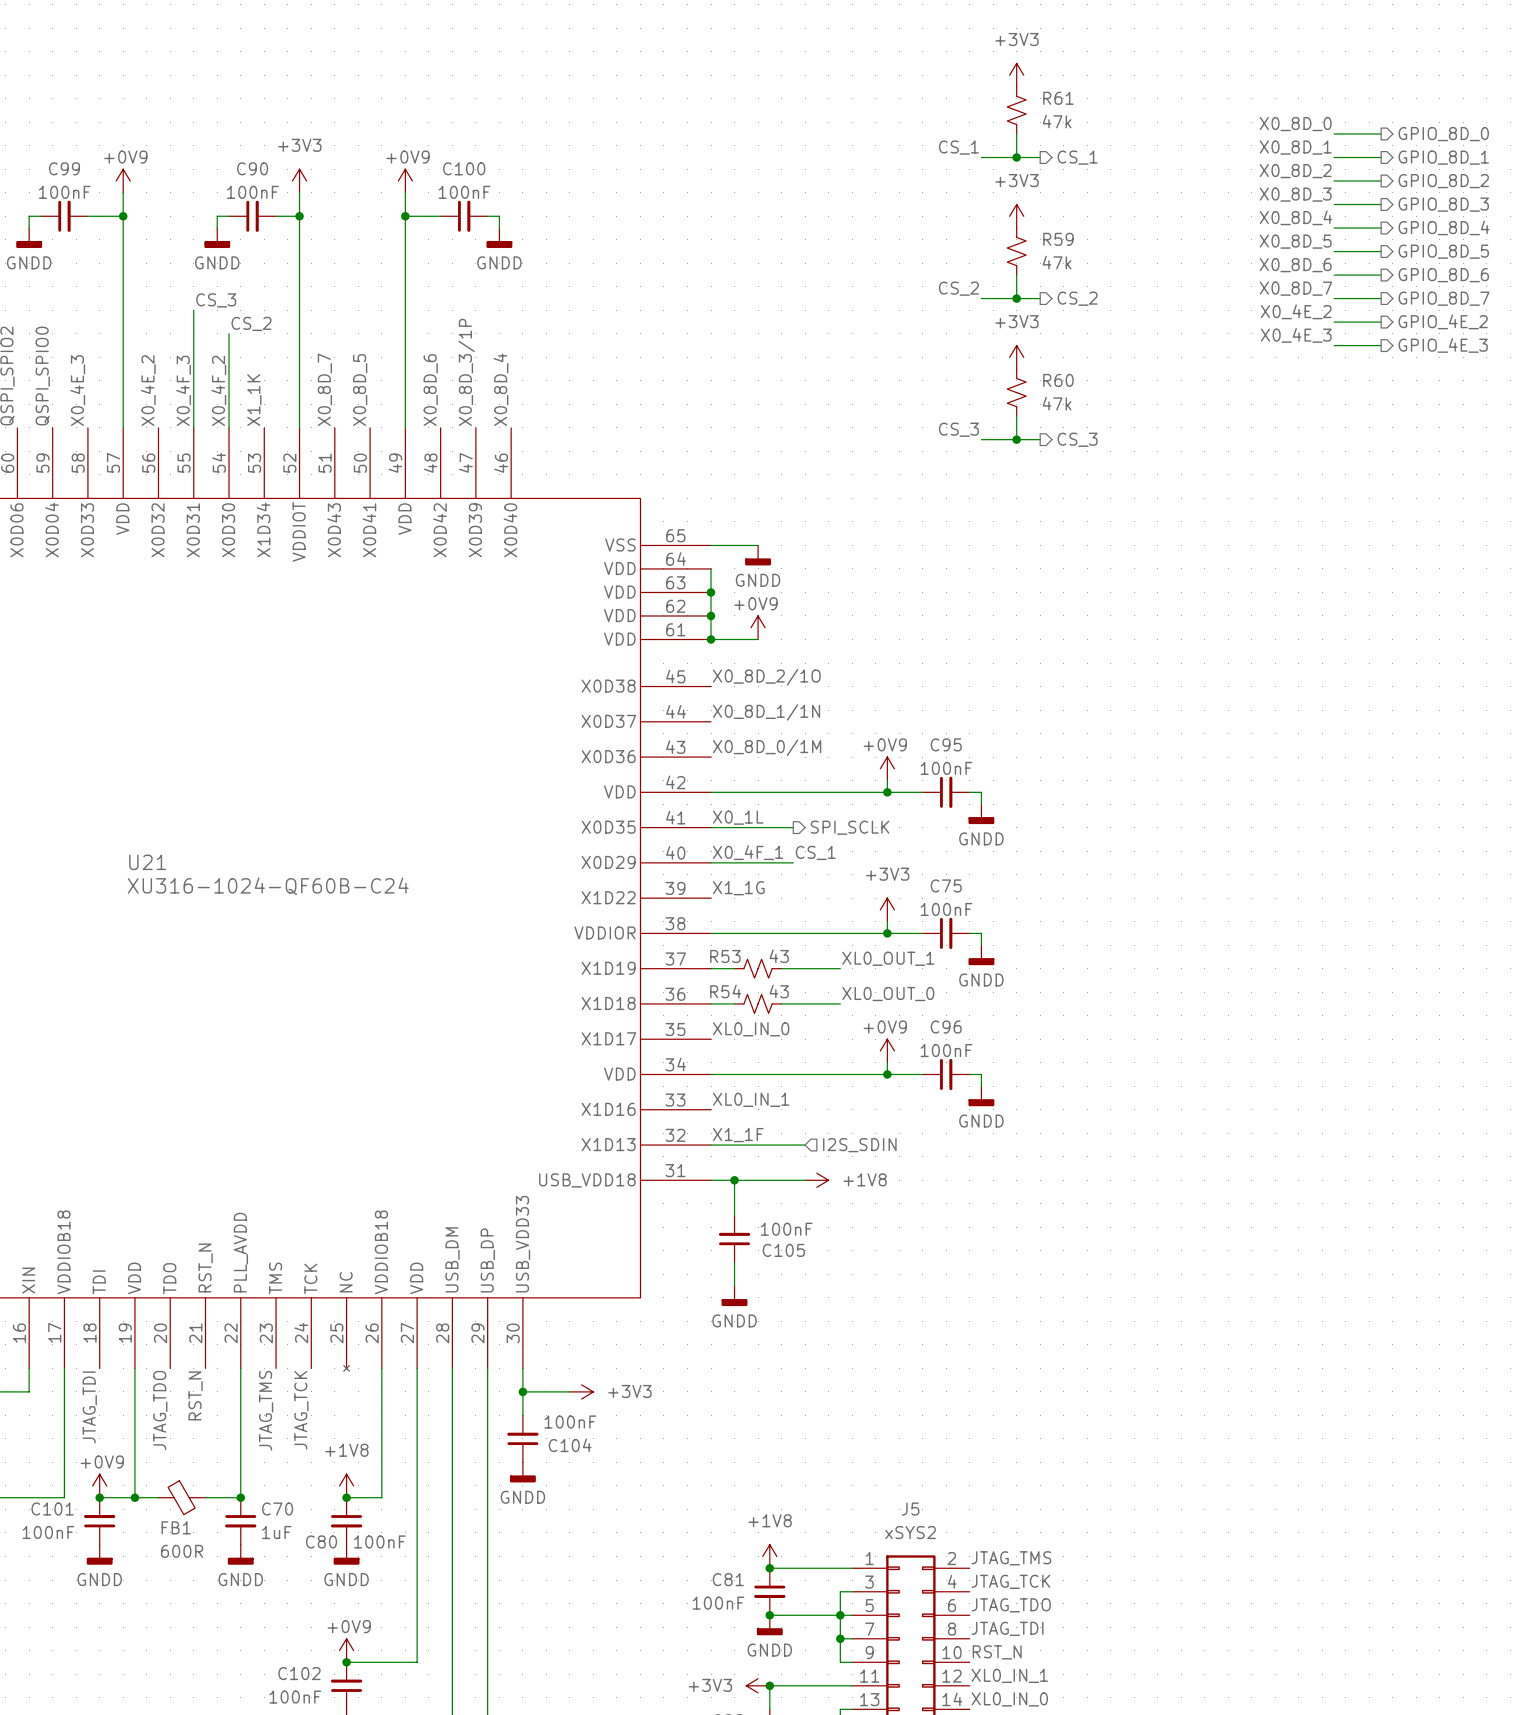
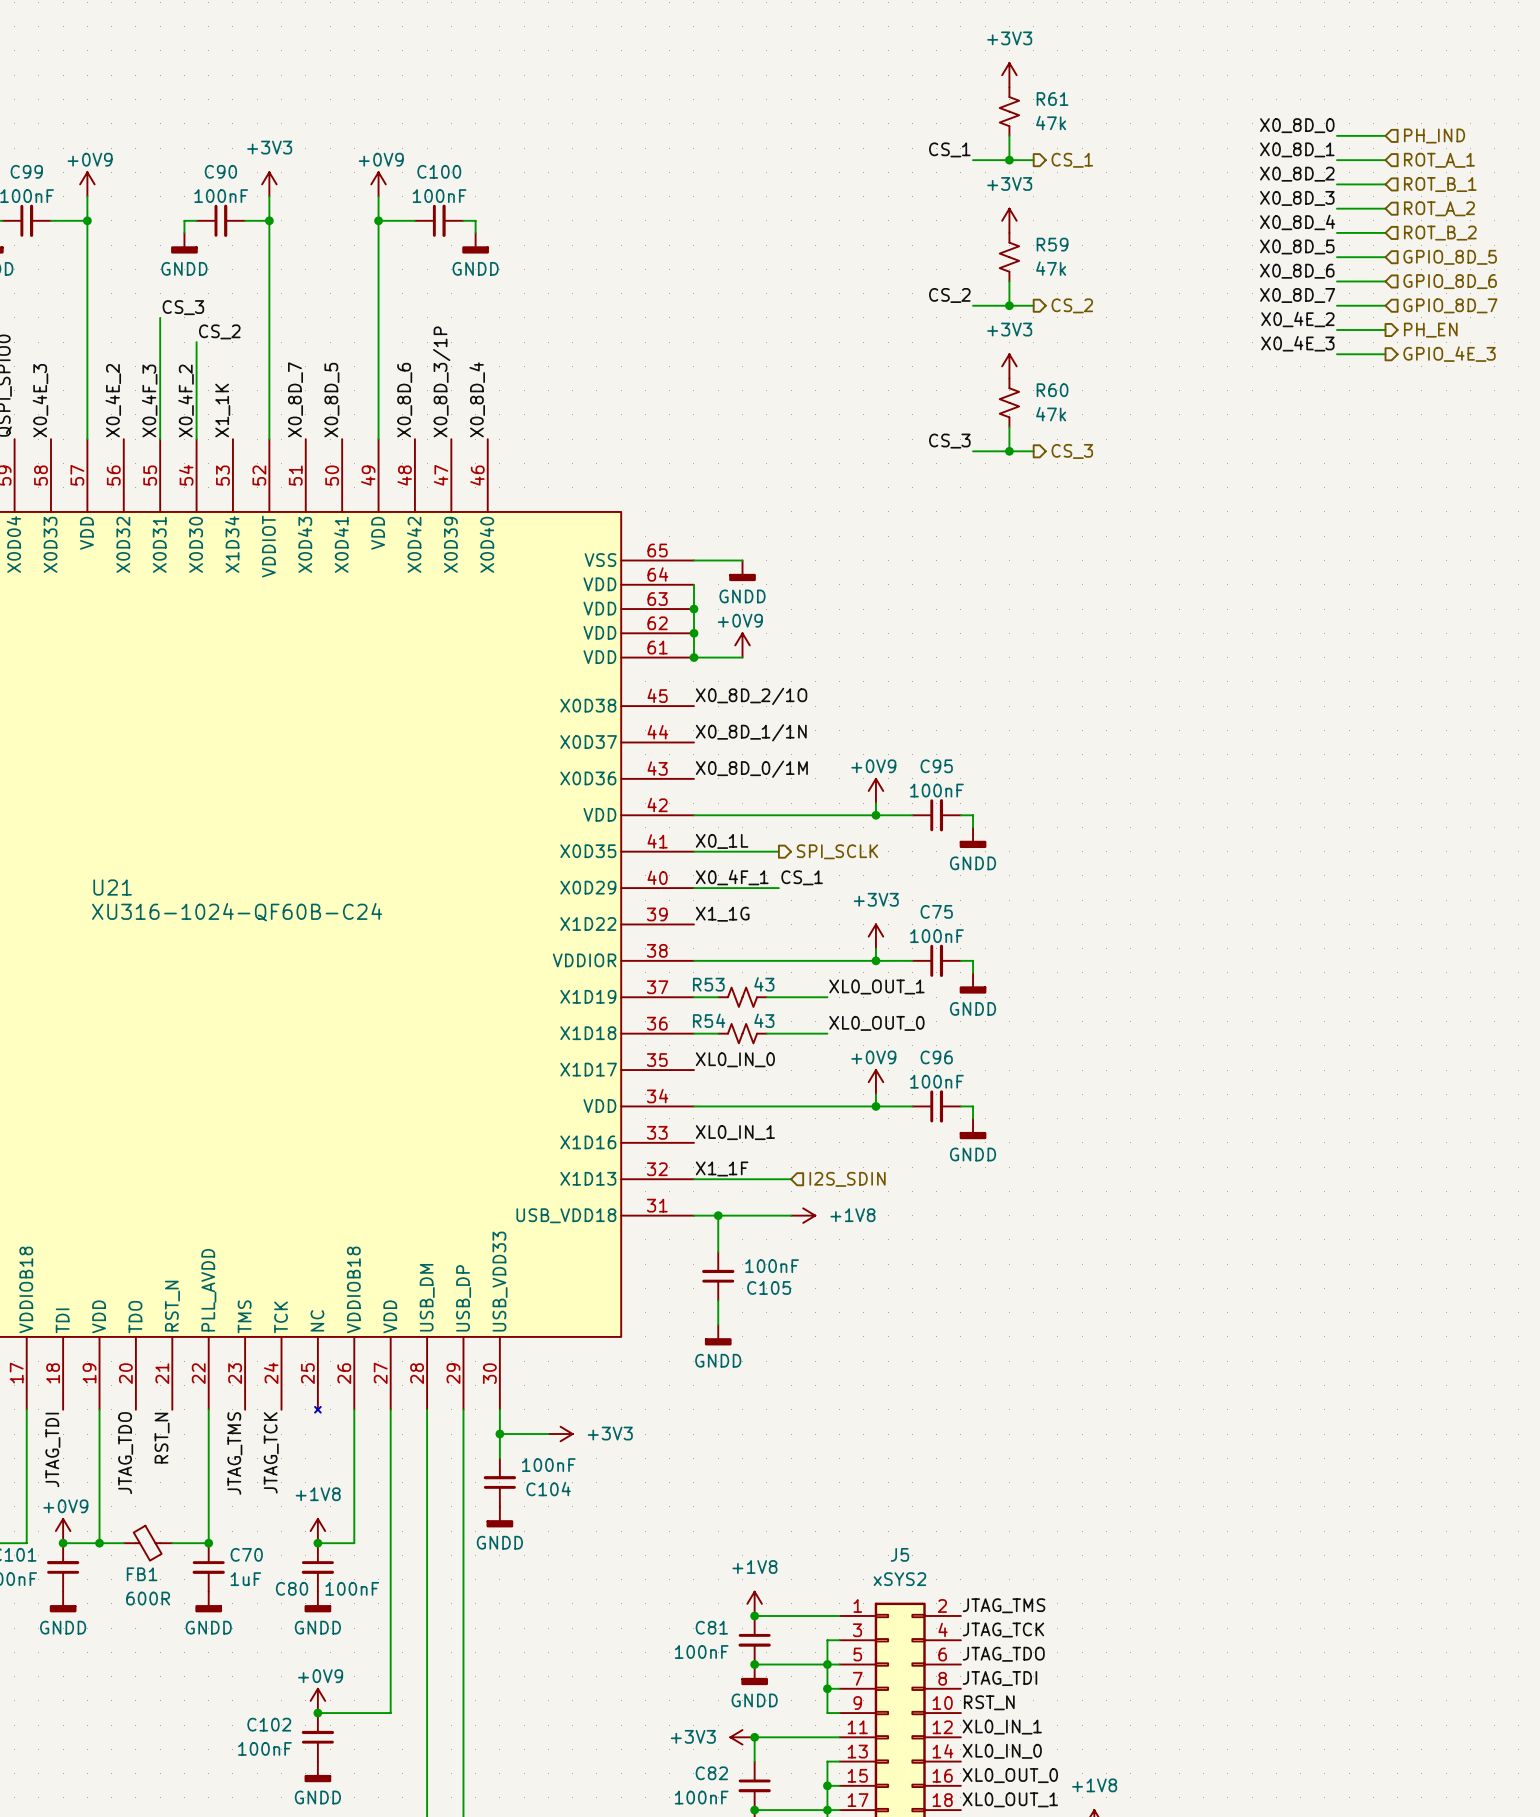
hierarchical label shape: output (1443, 134) -> input (1434, 136)
hierarchical label: GPIO_8D_0 (1443, 134) -> PH_IND (1434, 136)
hierarchical label shape: output (1443, 157) -> input (1439, 160)
hierarchical label: GPIO_8D_1 (1443, 157) -> ROT_A_1 (1439, 160)
hierarchical label shape: output (1443, 181) -> input (1440, 184)
hierarchical label: GPIO_8D_2 (1443, 181) -> ROT_B_1 (1440, 184)
hierarchical label shape: output (1443, 204) -> input (1439, 208)
hierarchical label: GPIO_8D_3 (1443, 204) -> ROT_A_2 (1439, 208)
hierarchical label shape: output (1444, 227) -> input (1440, 233)
hierarchical label: GPIO_8D_4 (1444, 227) -> ROT_B_2 (1440, 233)
hierarchical label shape: output (1443, 251) -> input (1450, 257)
hierarchical label shape: output (1443, 275) -> input (1450, 281)
hierarchical label shape: output (1444, 298) -> input (1450, 305)
hierarchical label: GPIO_4E_2 (1443, 321) -> PH_EN (1430, 330)

